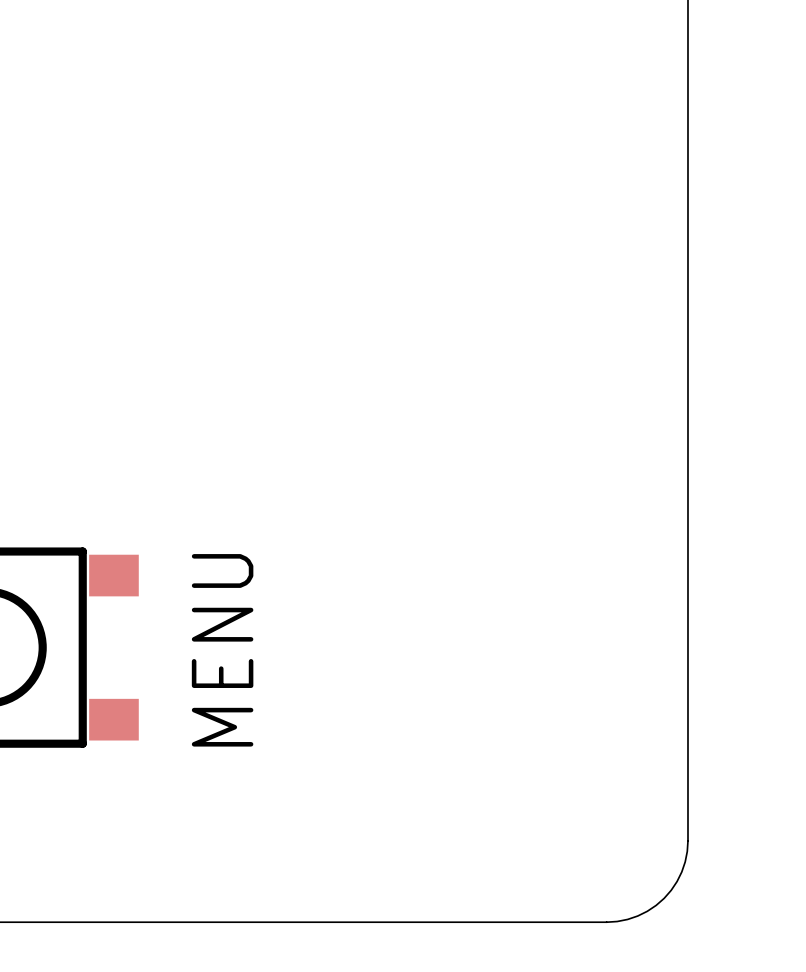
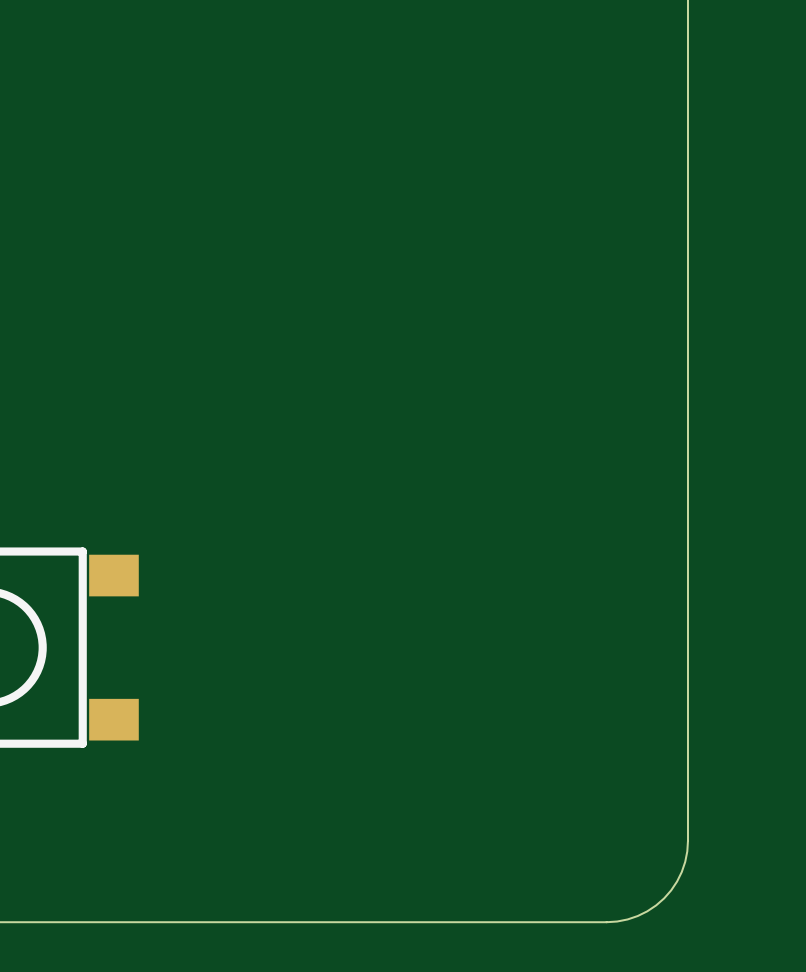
text: MENU (222, 650) -> none

